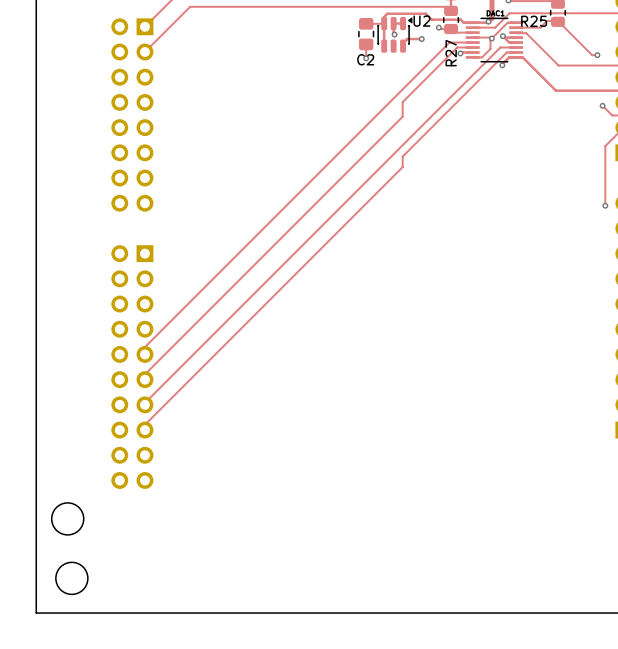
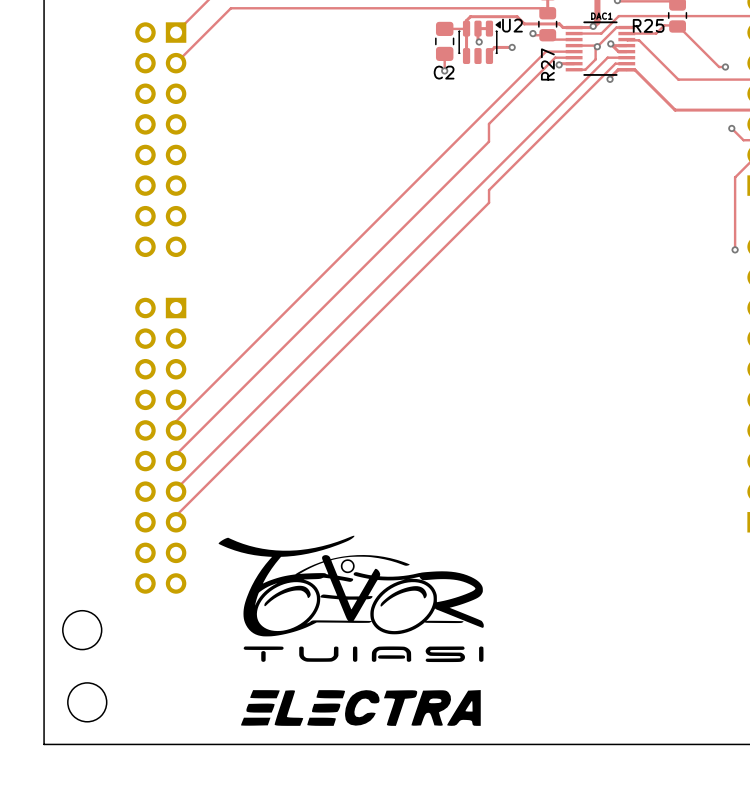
drawing: none -> [218, 535, 484, 663]
drawing: none -> [240, 690, 481, 726]

